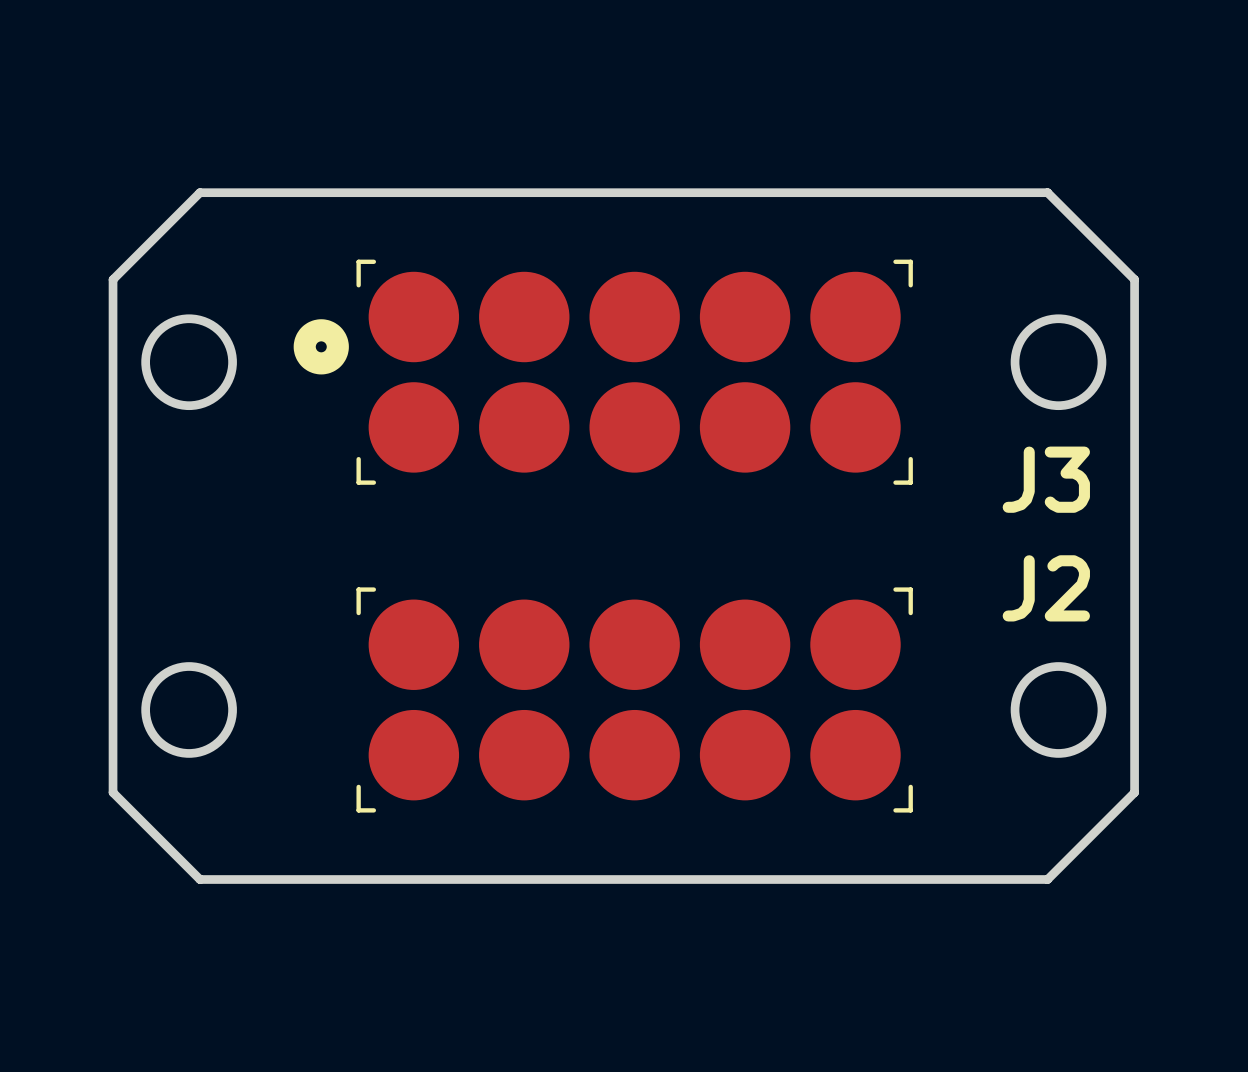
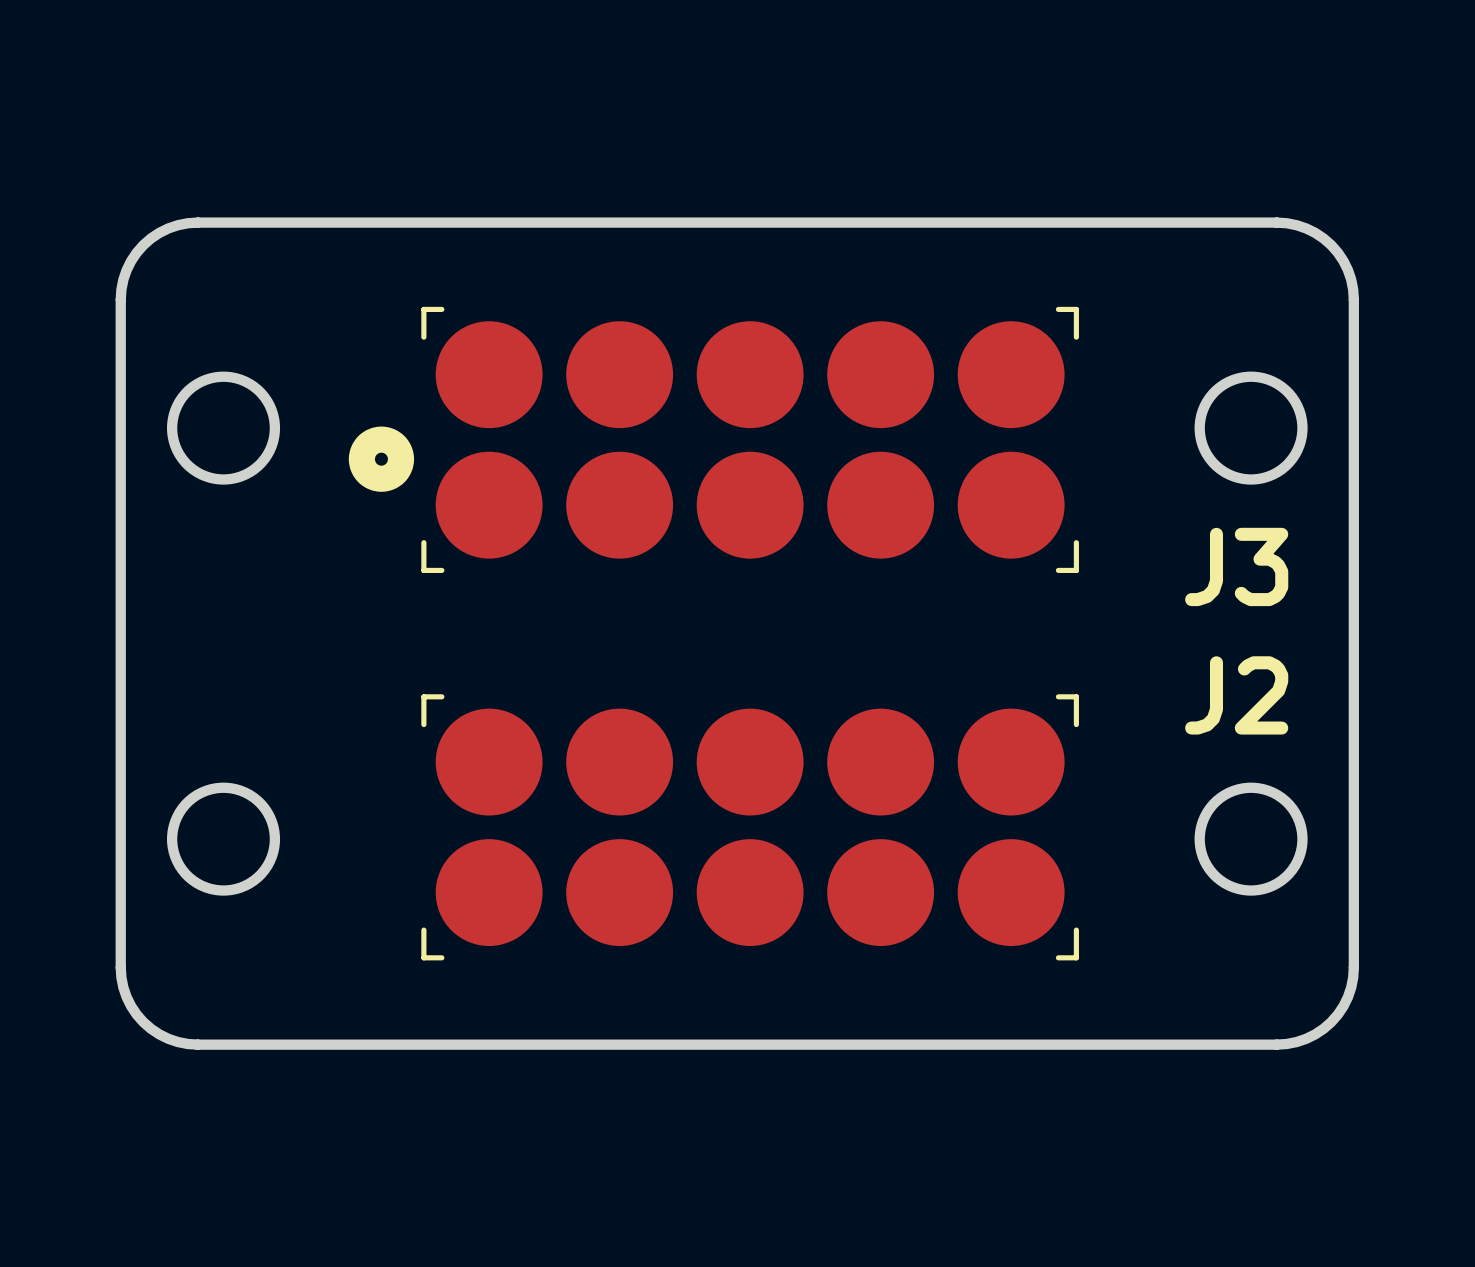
board edge: (199, 192) (113, 279) (113, 792) (199, 879) (1047, 879) (1134, 792) (1134, 279) (1047, 192) (199, 192) -> (197, 222) (168, 228) (143, 245) (126, 270) (120, 299) (120, 967) (126, 997) (136, 1014) (150, 1028) (168, 1038) (197, 1044) (1276, 1044) (1296, 1042) (1315, 1034) (1337, 1014) (1347, 997) (1353, 967) (1353, 299) (1351, 279) (1343, 261) (1323, 238) (1296, 225) (1276, 222) (197, 222)
part position: (321, 346) -> (381, 459)

